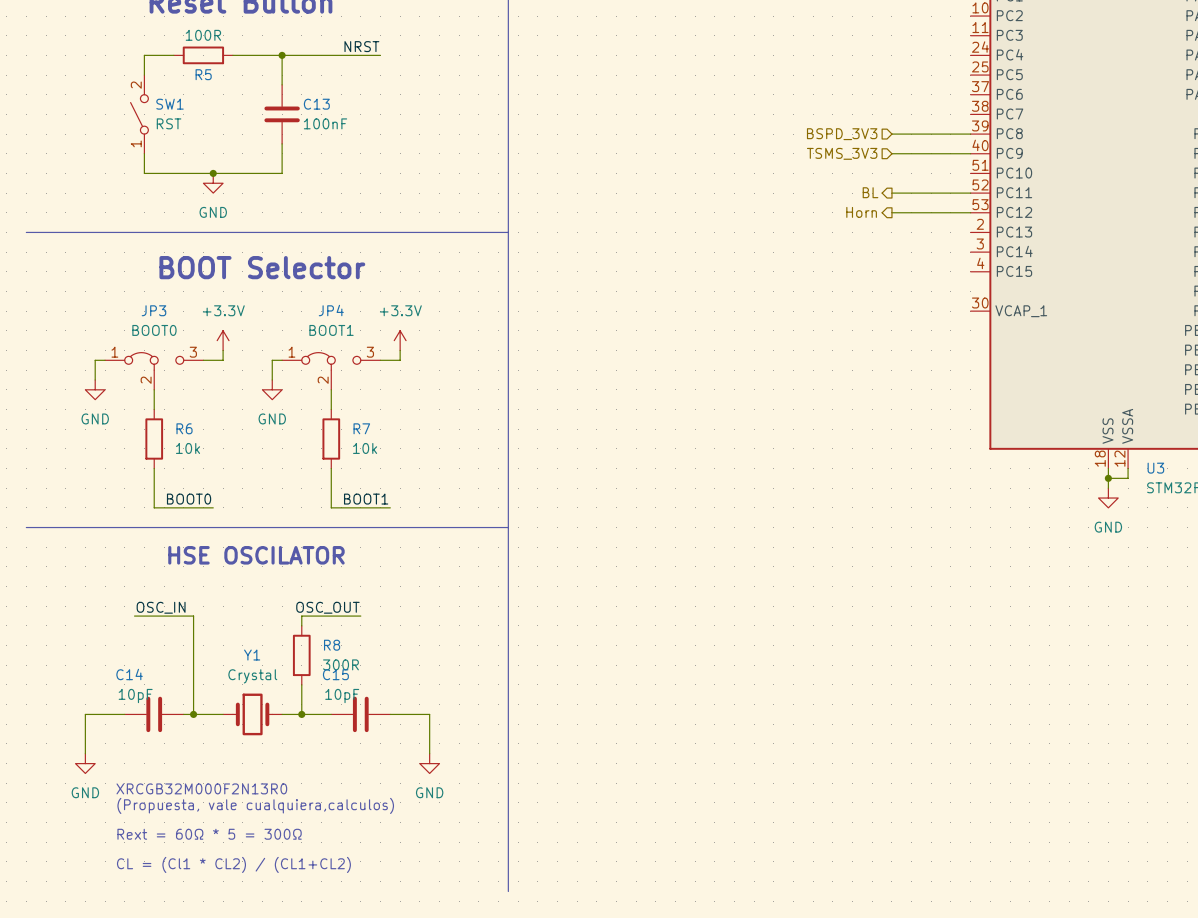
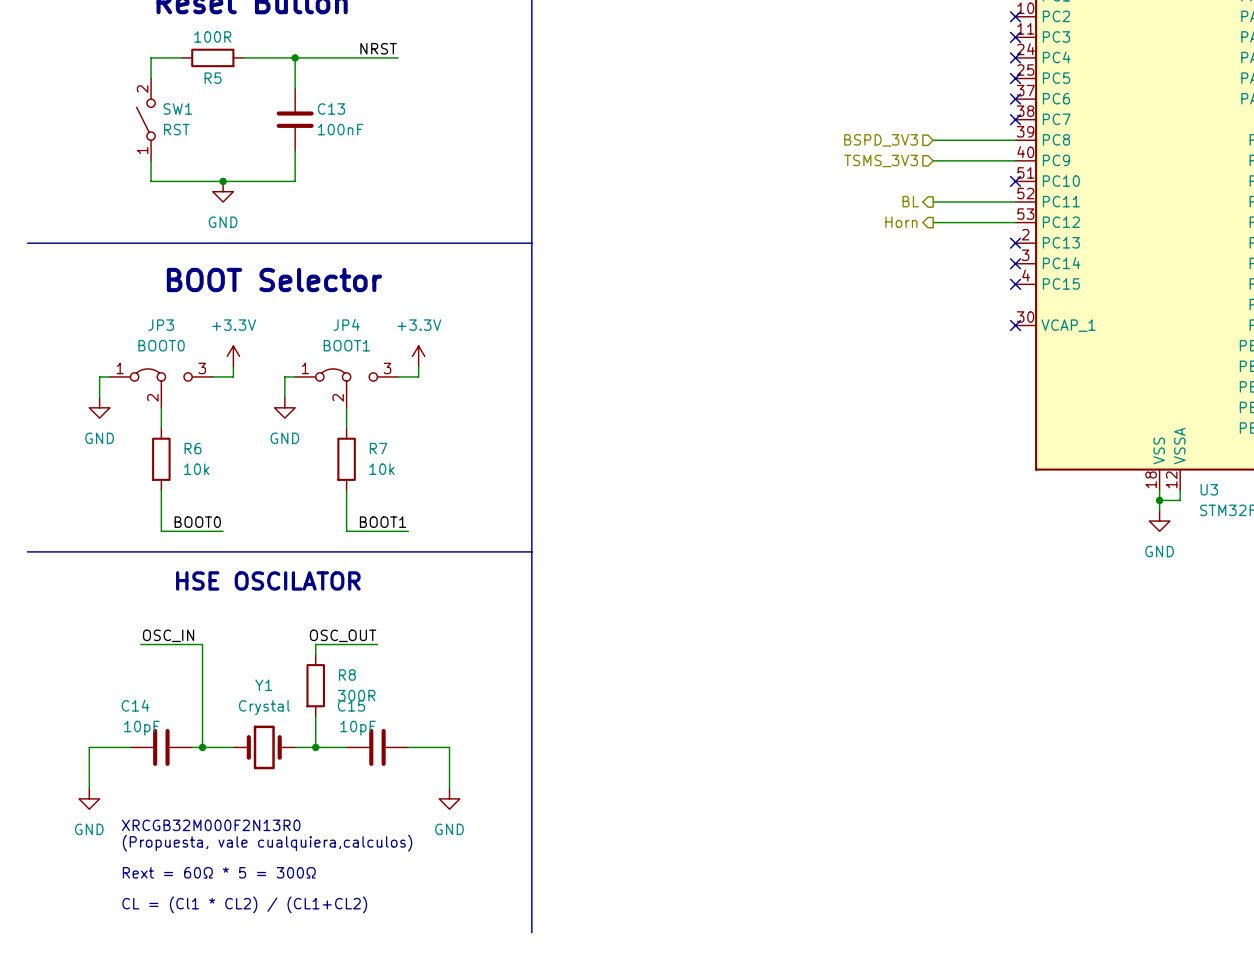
no-connect mark: none -> (1015, 16)
no-connect mark: none -> (1015, 37)
no-connect mark: none -> (1015, 57)
no-connect mark: none -> (1015, 78)
no-connect mark: none -> (1015, 99)
no-connect mark: none -> (1015, 119)
no-connect mark: none -> (1015, 181)
no-connect mark: none -> (1015, 243)
no-connect mark: none -> (1015, 263)
no-connect mark: none -> (1015, 284)
no-connect mark: none -> (1015, 325)

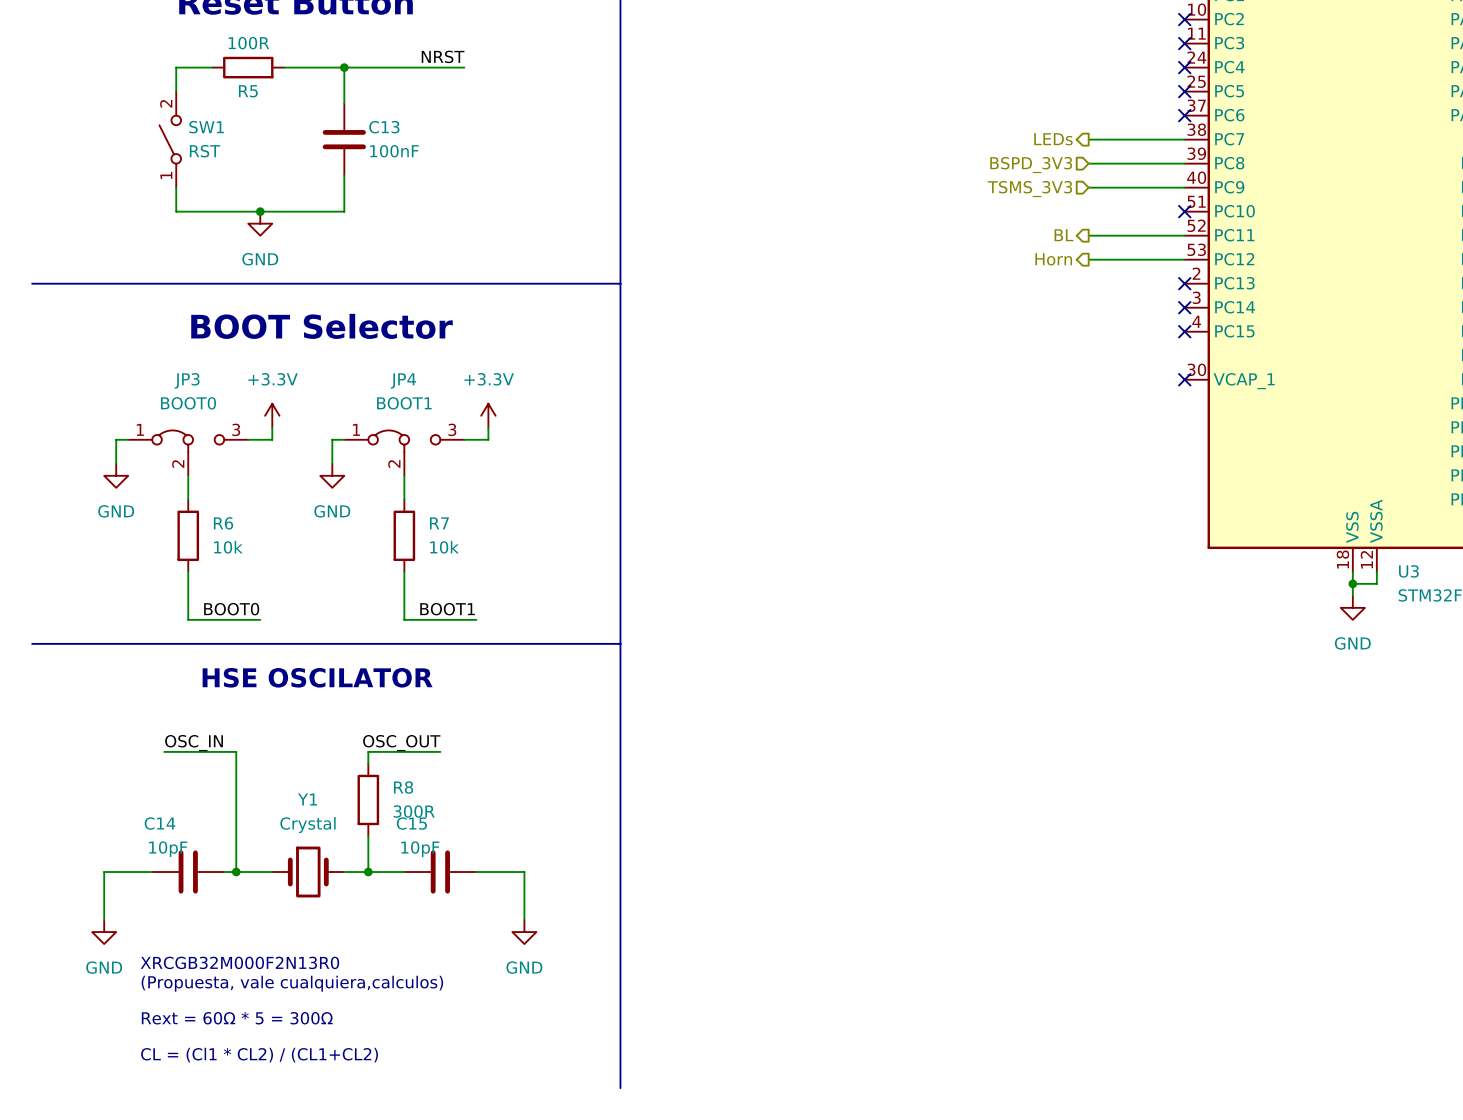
hierarchical label: none -> LEDs (1053, 139)
wire: none -> (1088, 139) (1184, 139)
no-connect mark: (1015, 119) -> none

